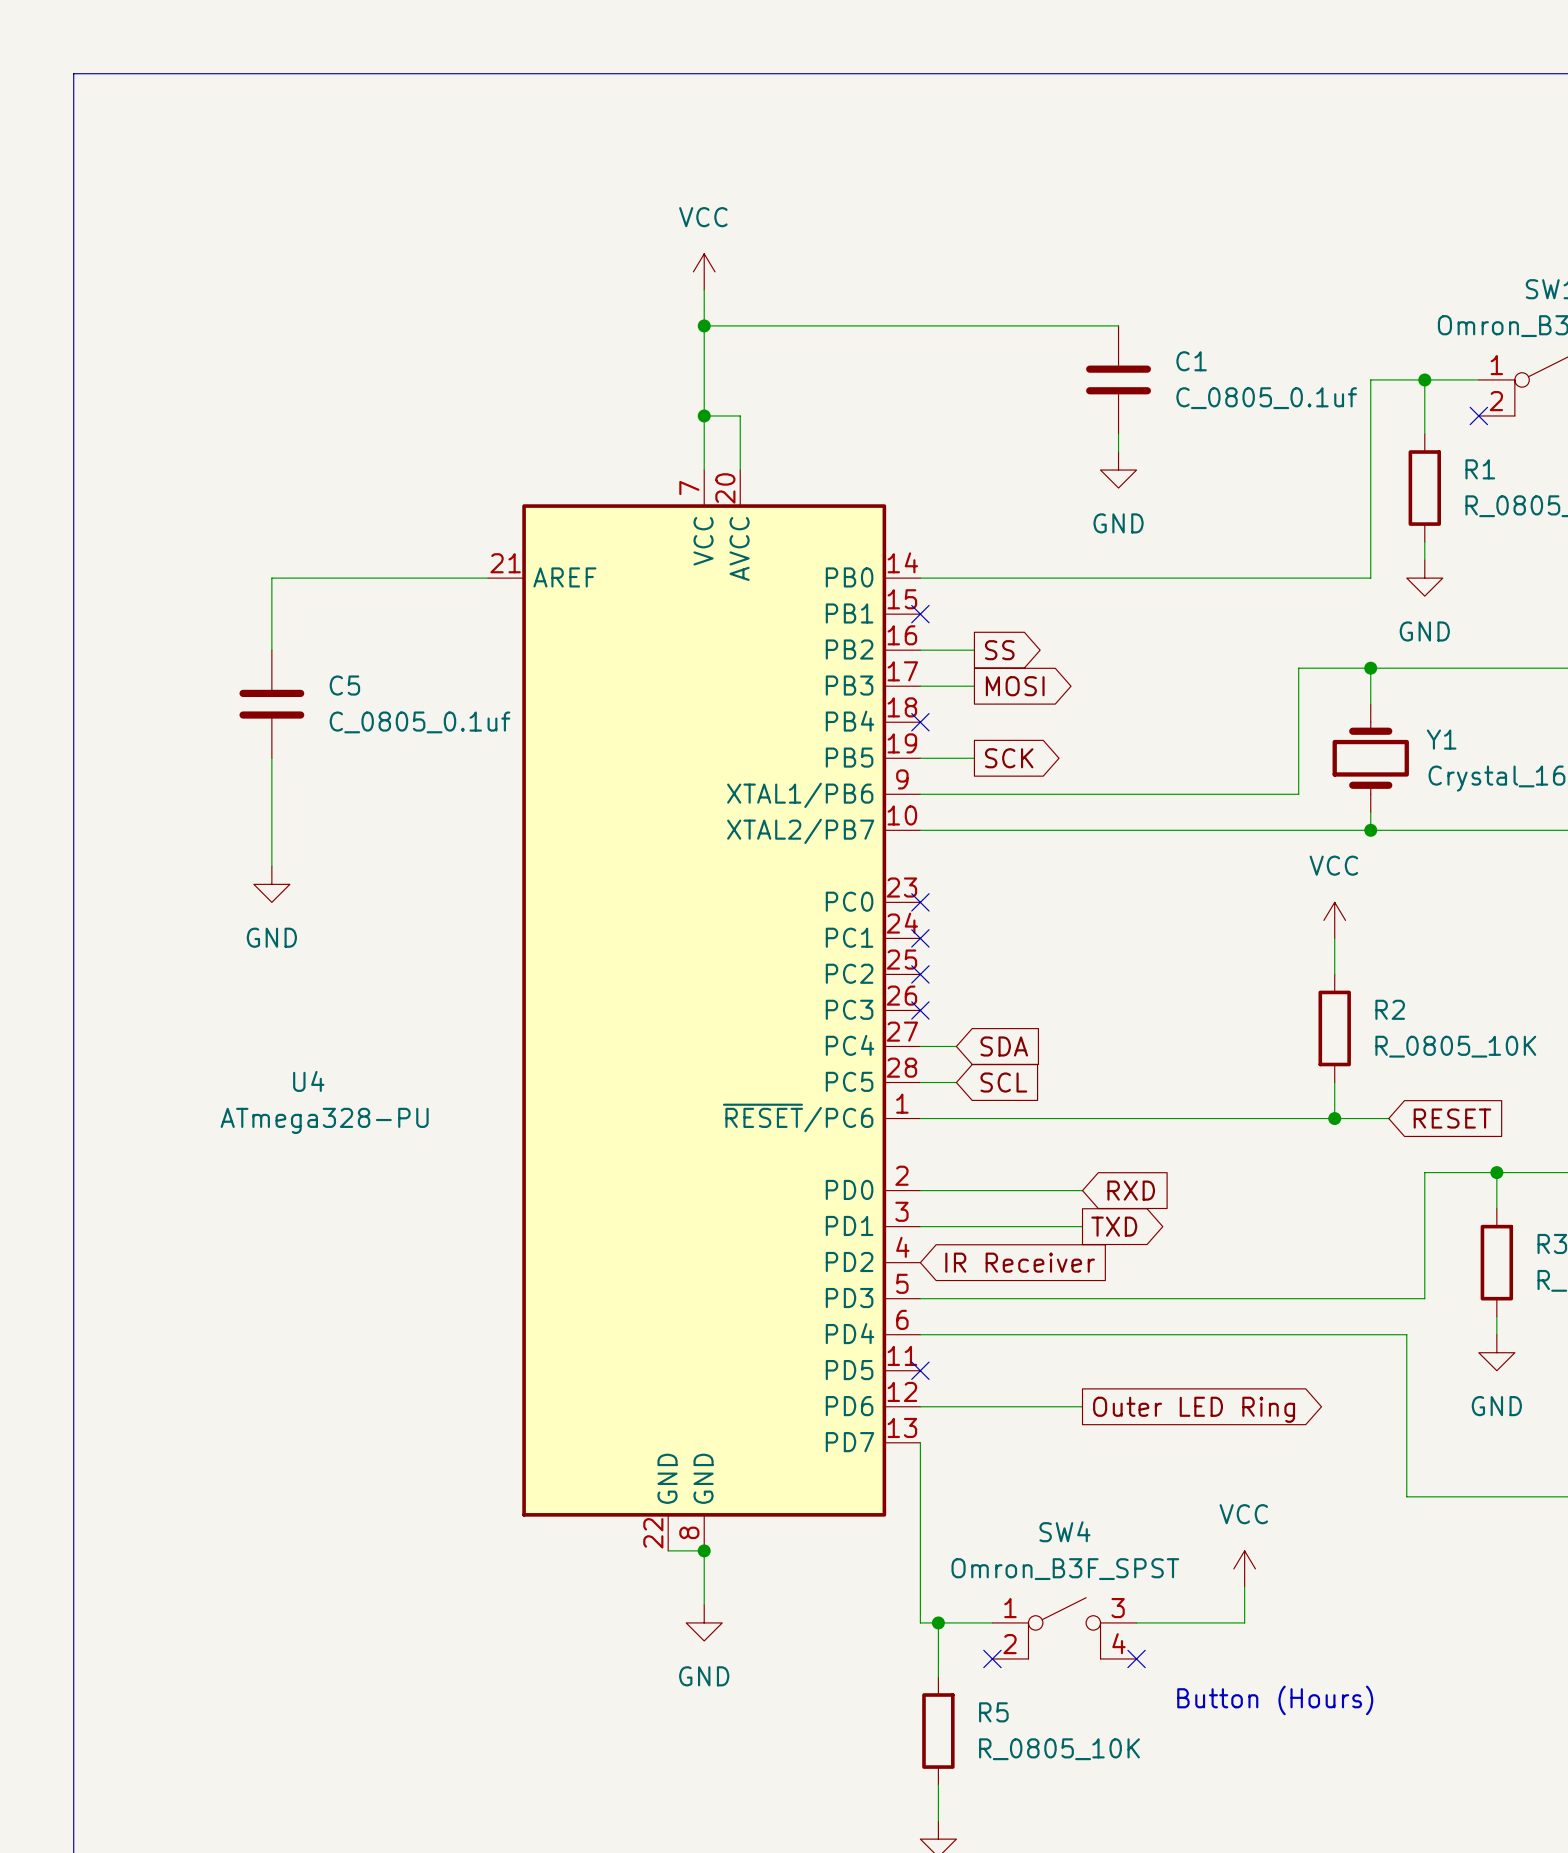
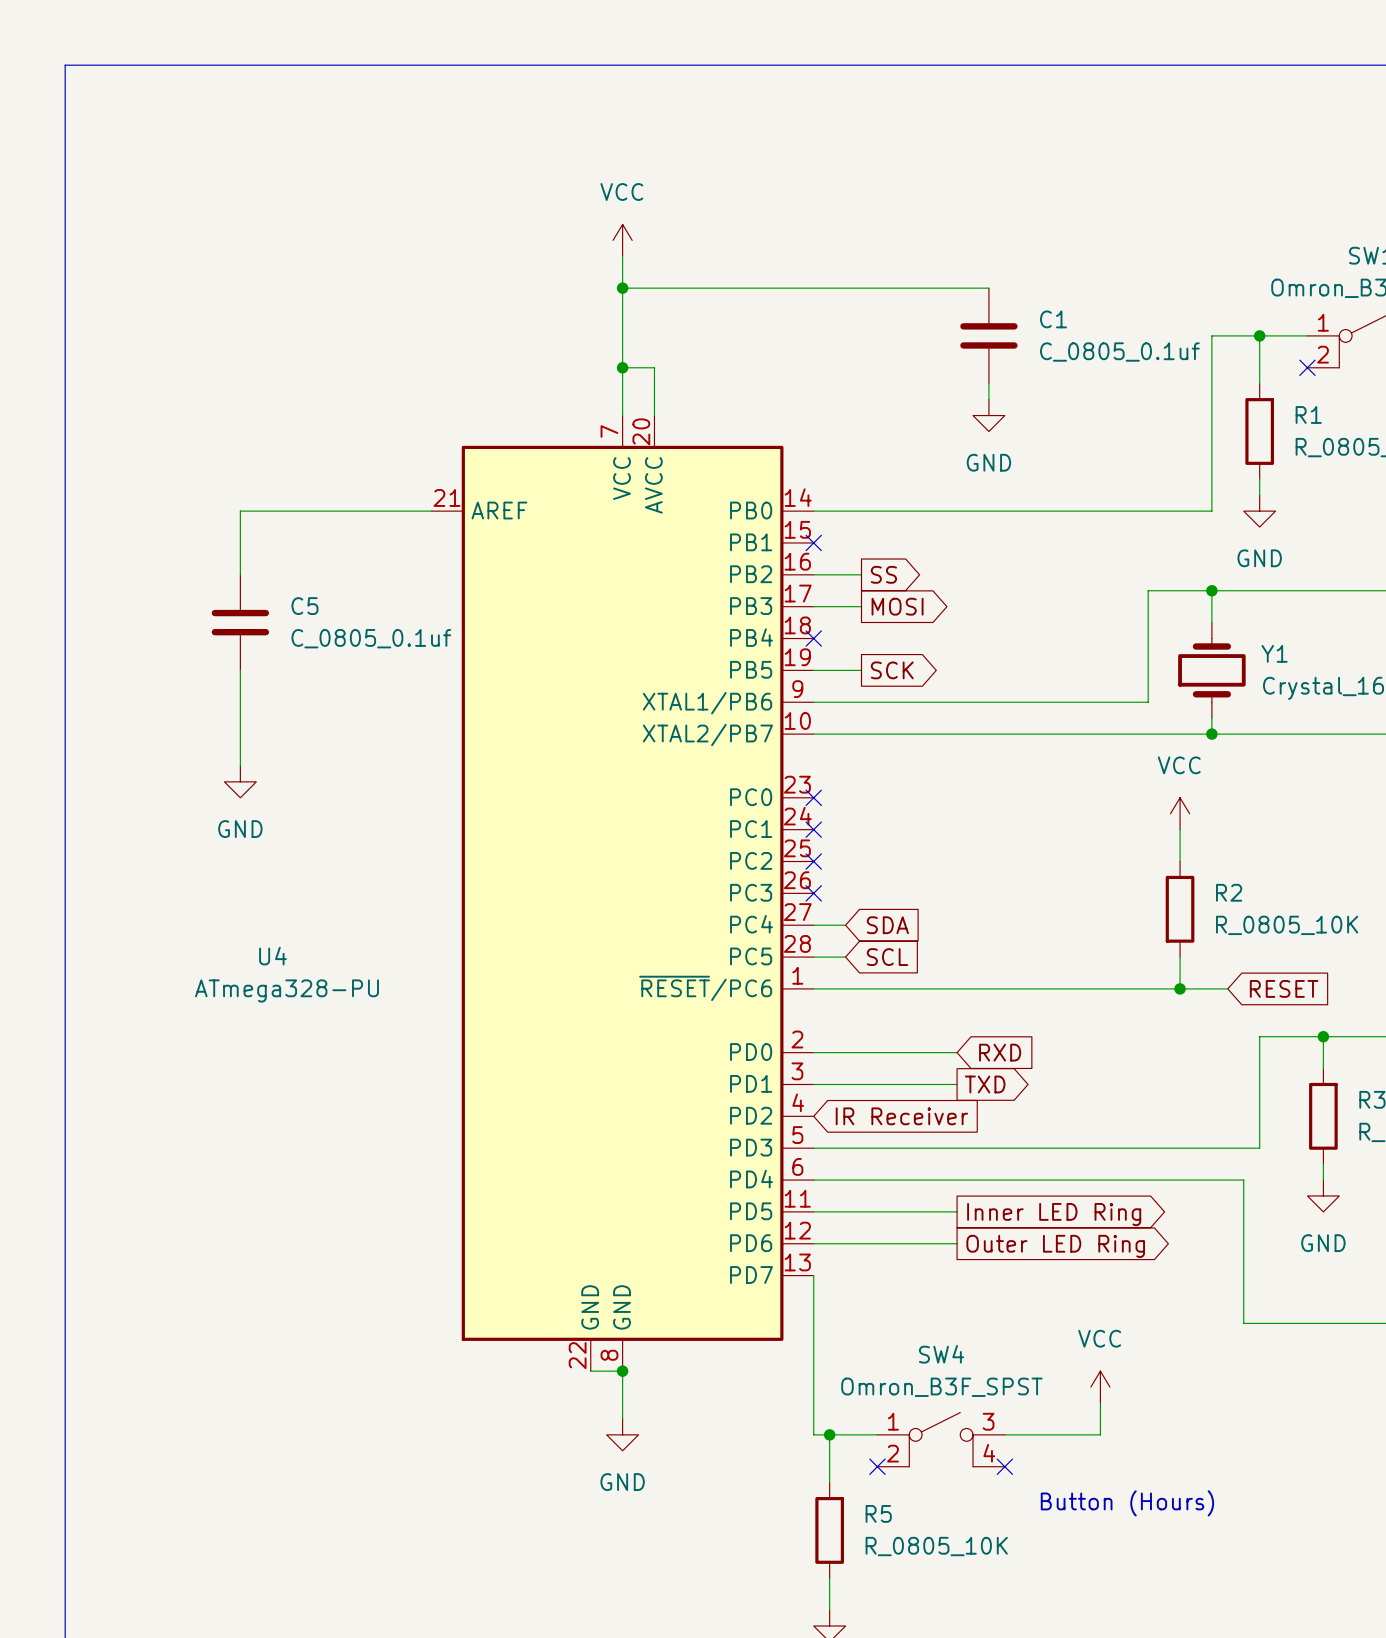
wire: none -> (813, 1211) (957, 1211)
no-connect mark: (920, 1370) -> none
global label: none -> Inner LED Ring (1054, 1214)

